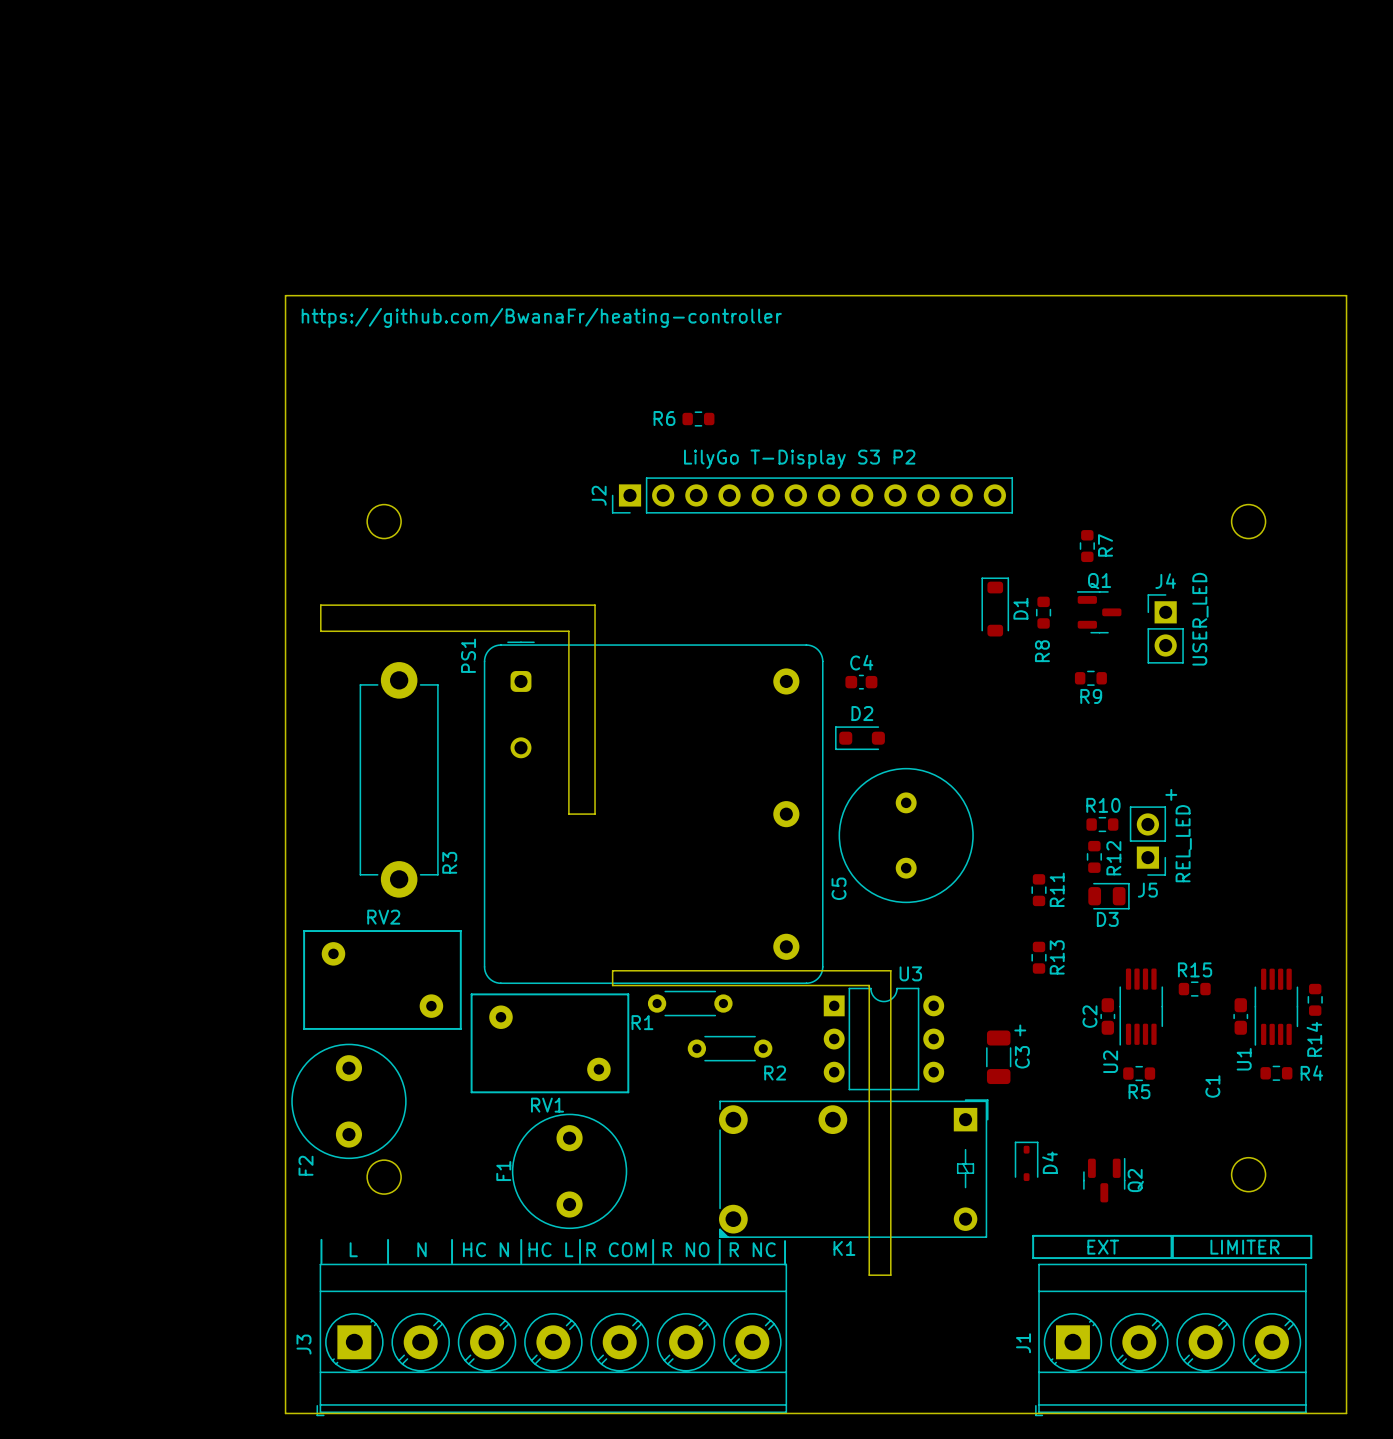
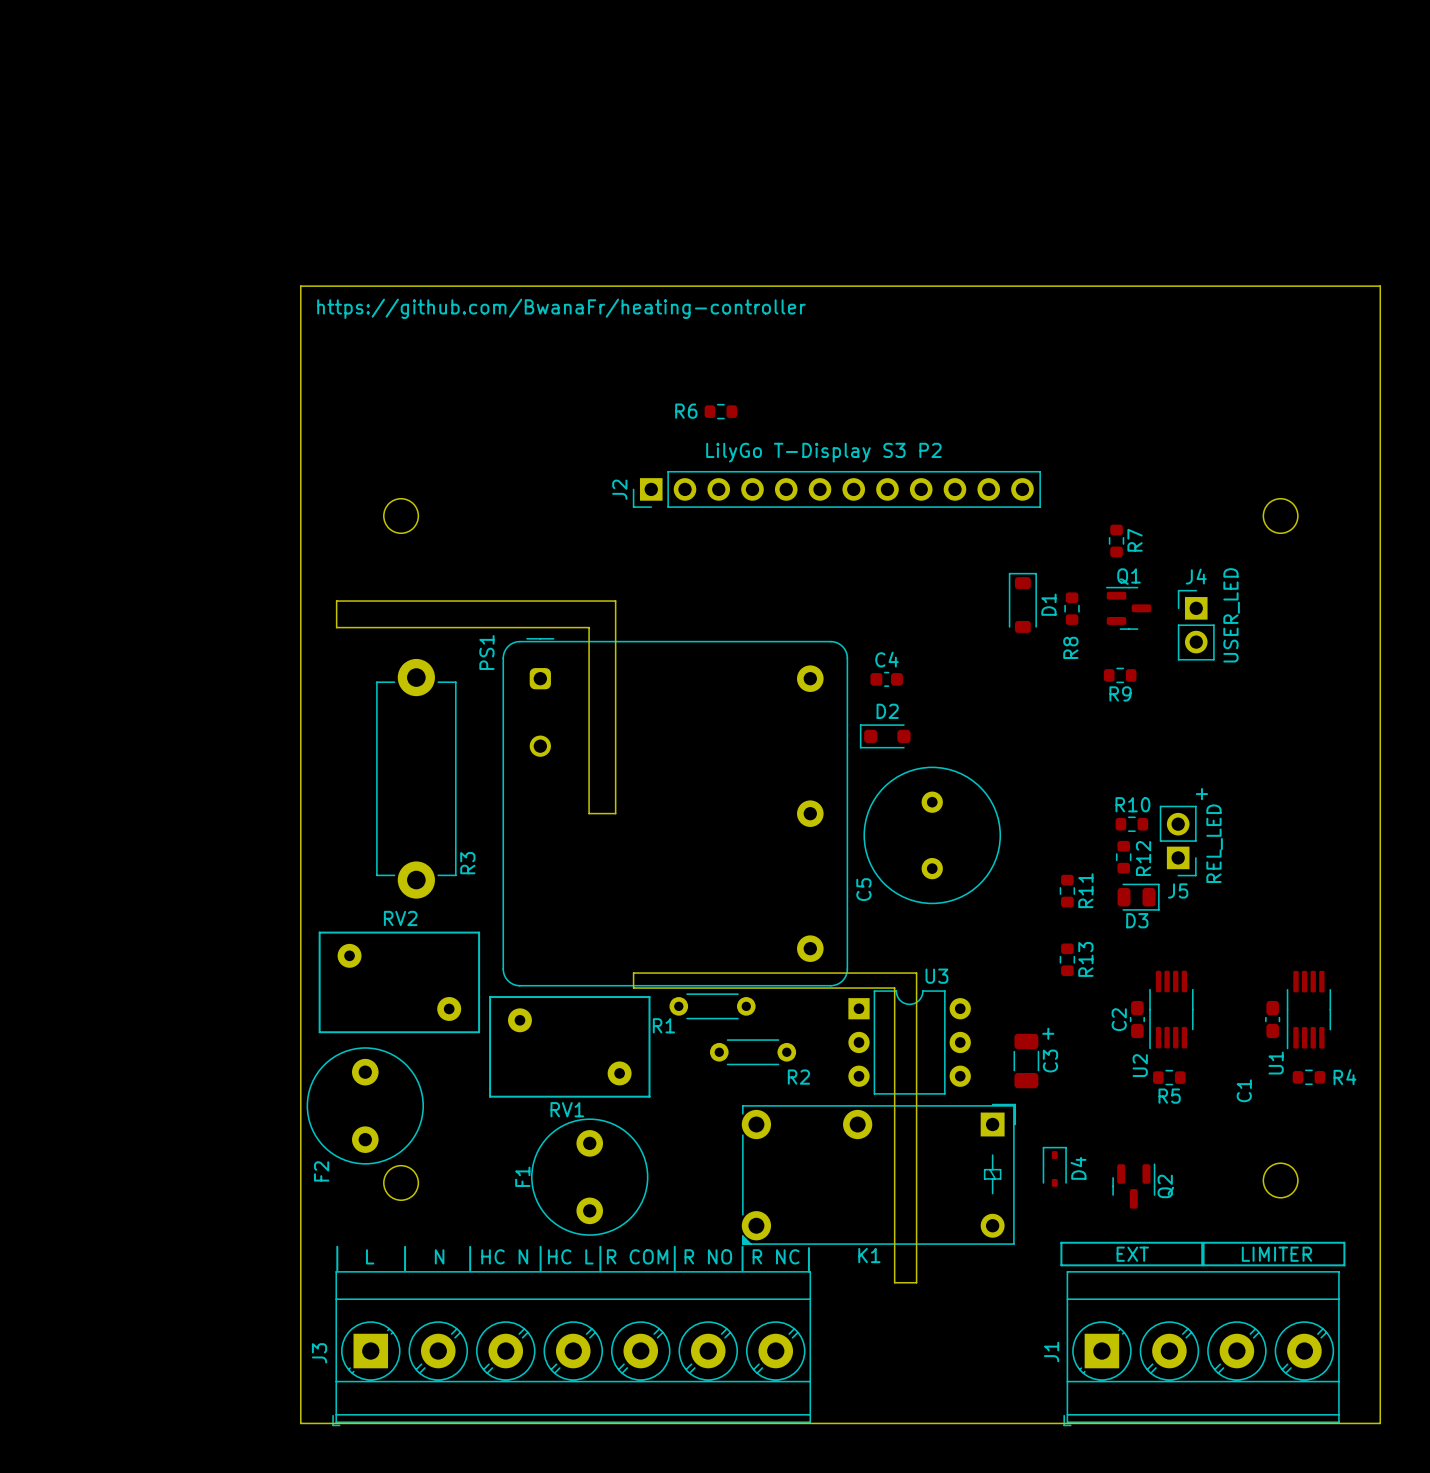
R15: (1194, 989) -> none
R14: (1315, 999) -> none

